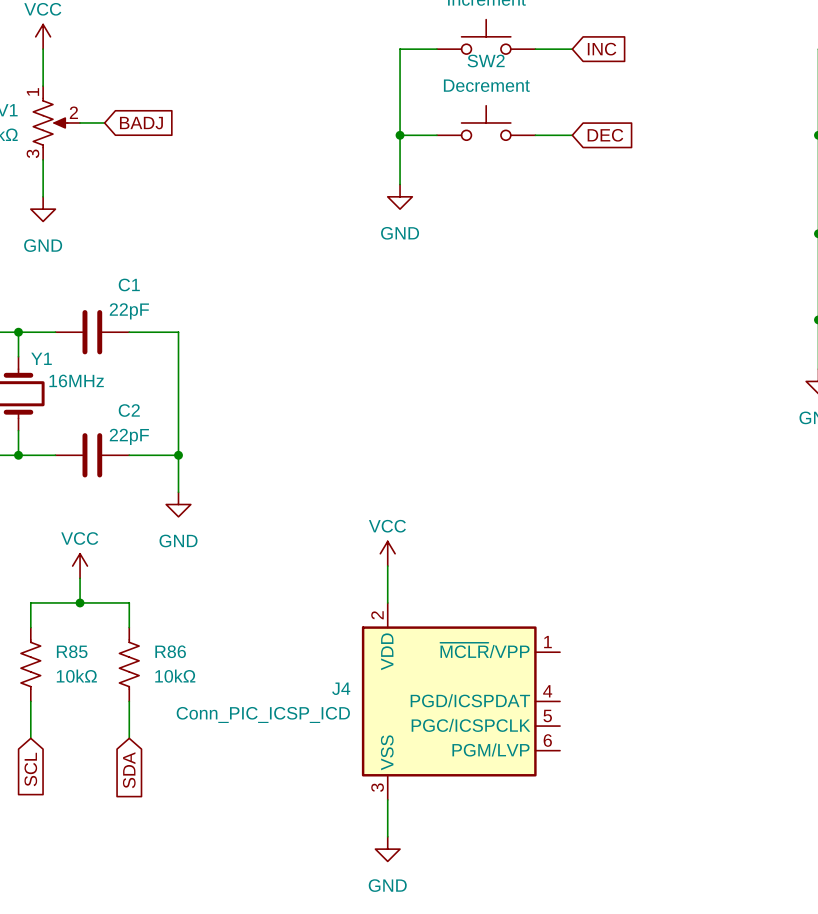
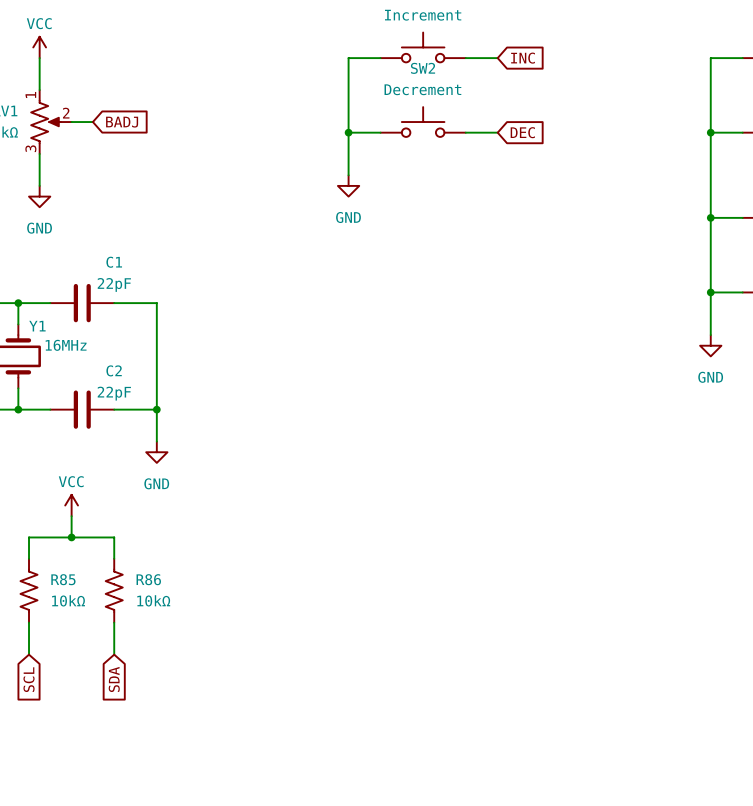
power symbol: VCC (387, 553) -> none
wire: (387, 566) (387, 602) -> none
J4: Conn_PIC_ICSP_ICD (460, 701) -> none
wire: (387, 799) (387, 836) -> none
power symbol: GND (387, 849) -> none

